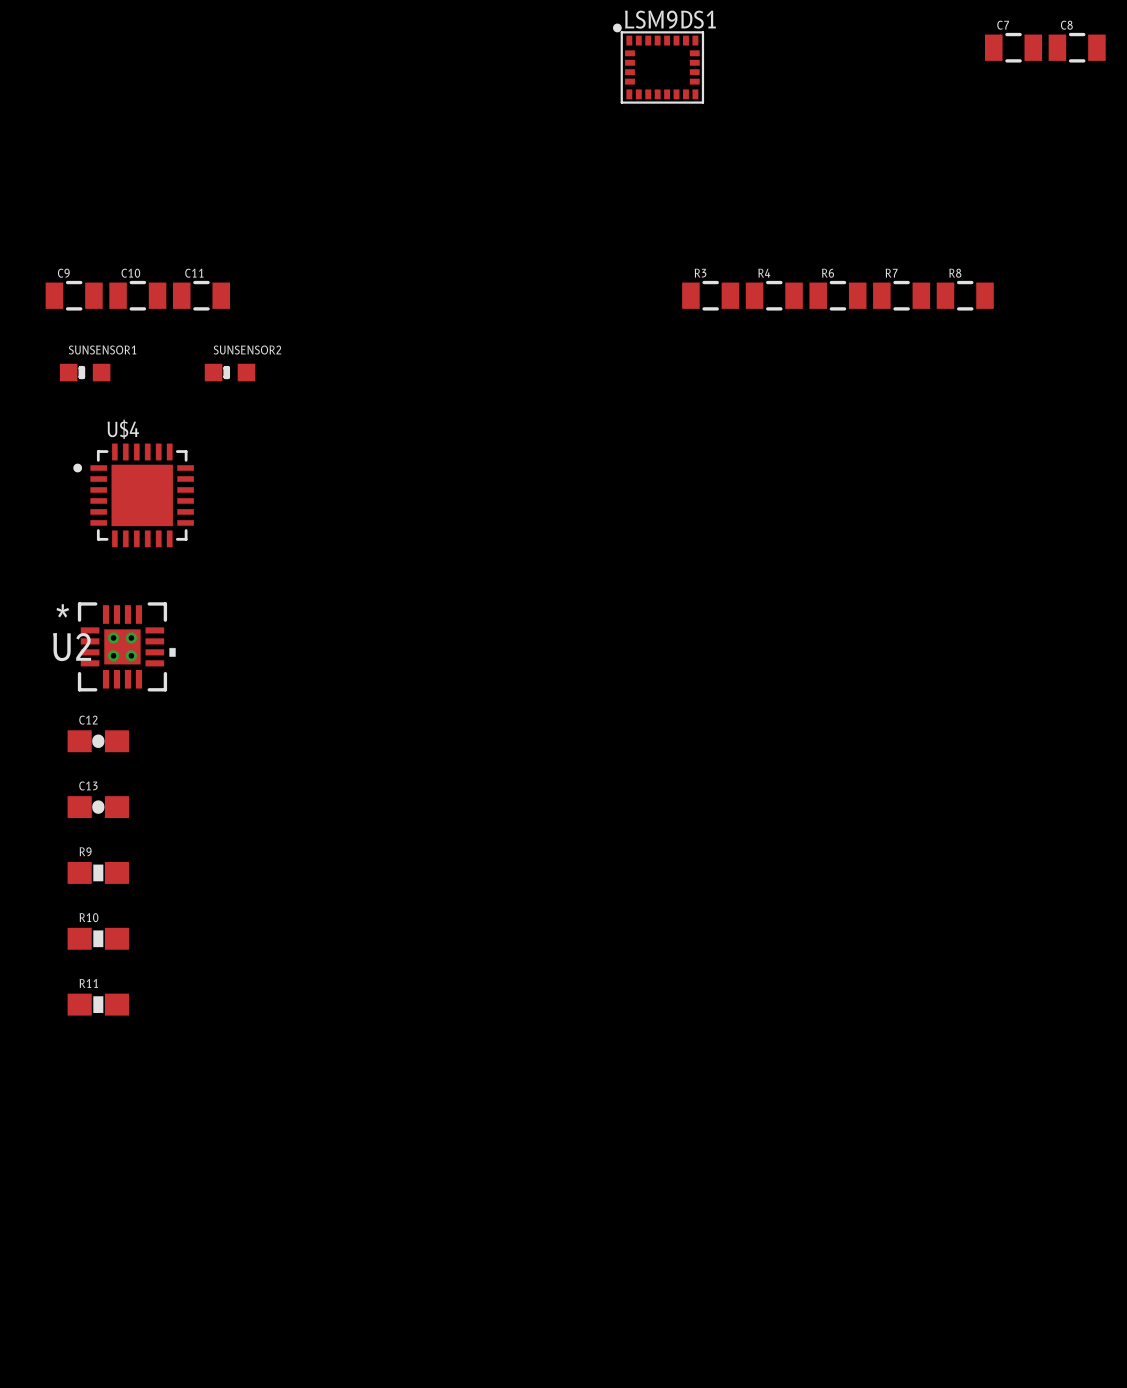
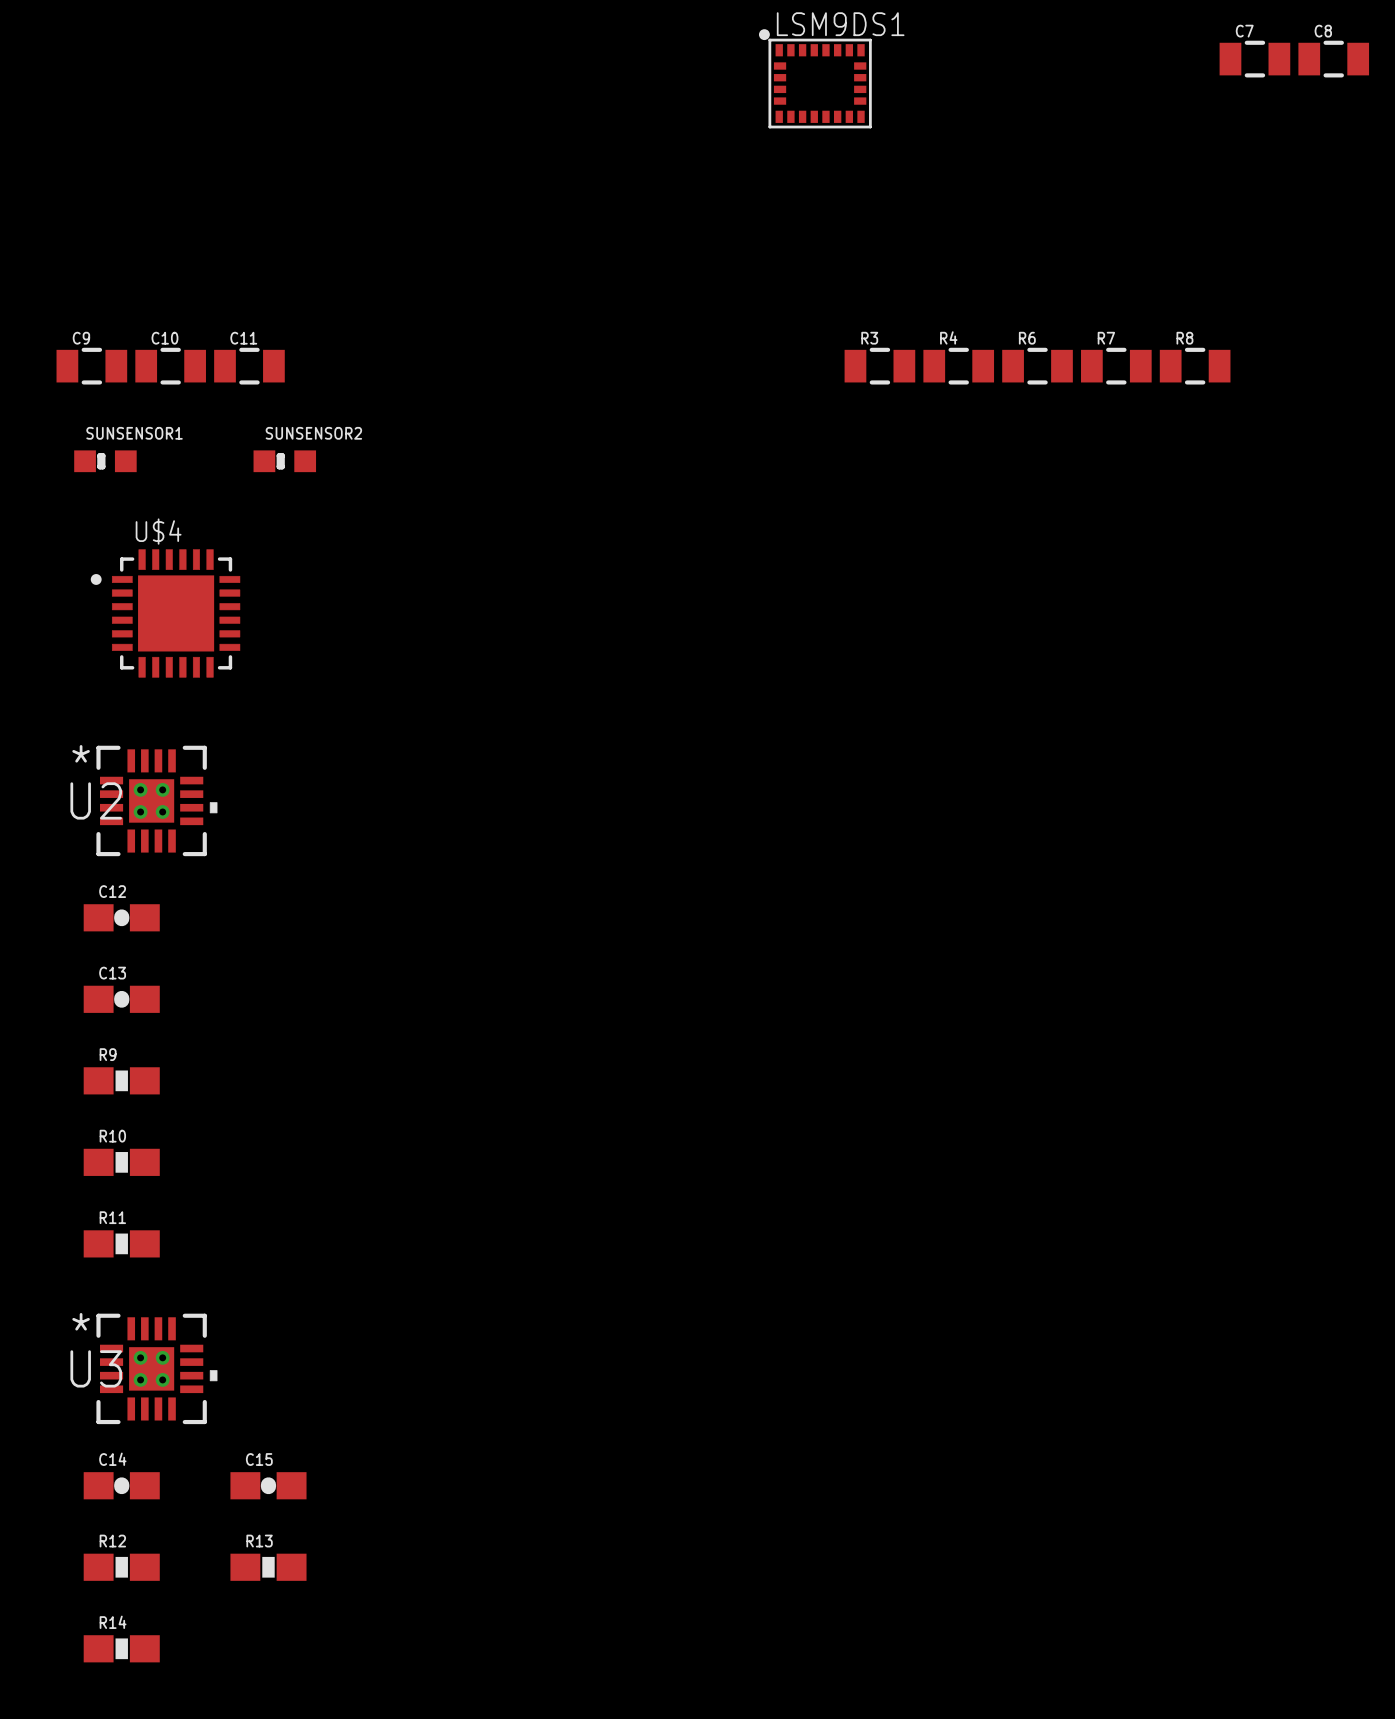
U3: none -> (156, 1368)
C14: none -> (121, 1485)
C15: none -> (268, 1485)
R12: none -> (121, 1567)
R13: none -> (268, 1567)
R14: none -> (121, 1648)

